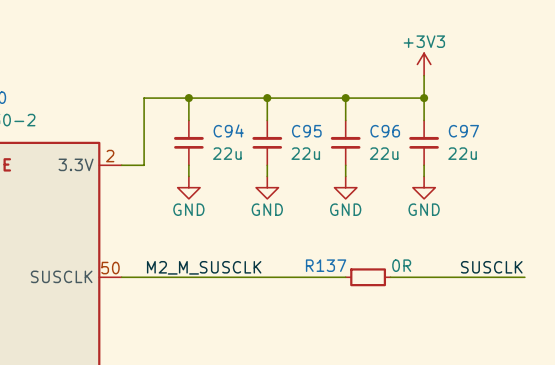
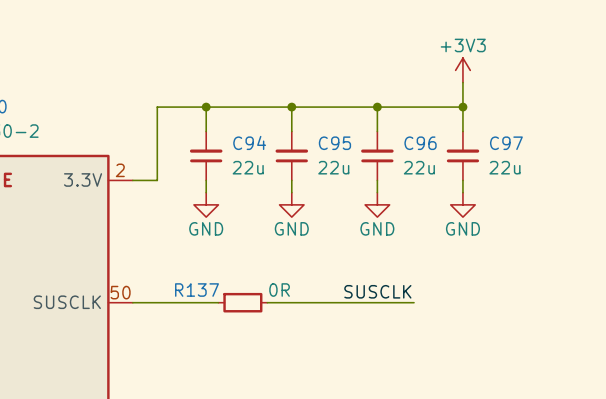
label: M2_M_SUSCLK (204, 267) -> none
label position: SUSCLK (491, 267) -> SUSCLK (377, 291)
wire: (200, 277) (244, 277) -> none
wire: none -> (377, 302) (414, 302)
R137 position: (368, 277) -> (242, 302)
wire: (390, 277) (524, 277) -> none

